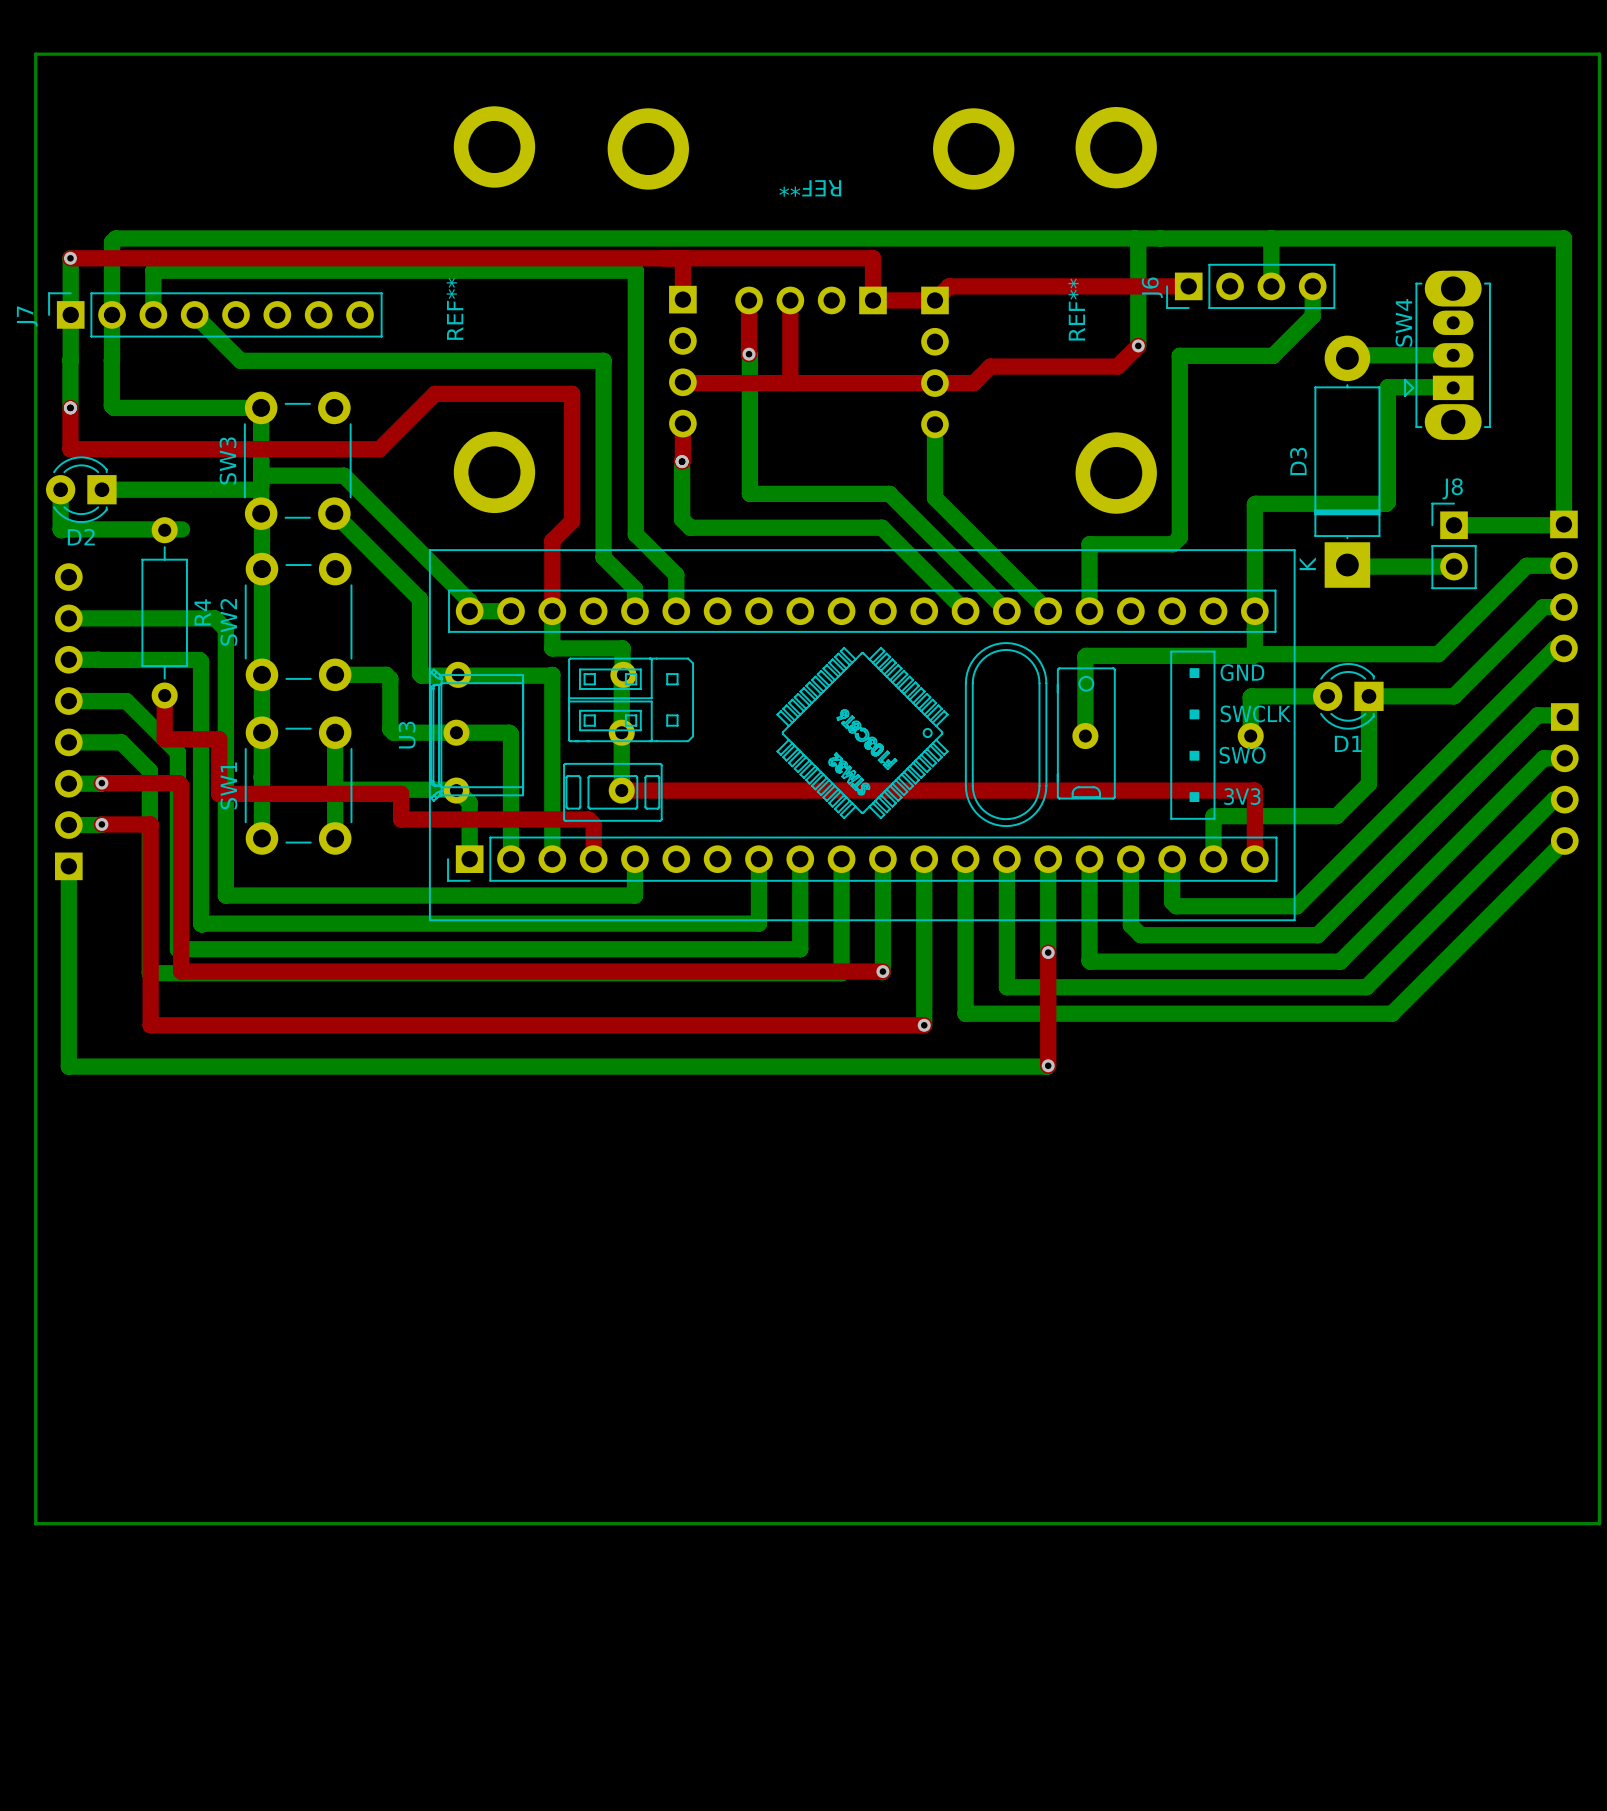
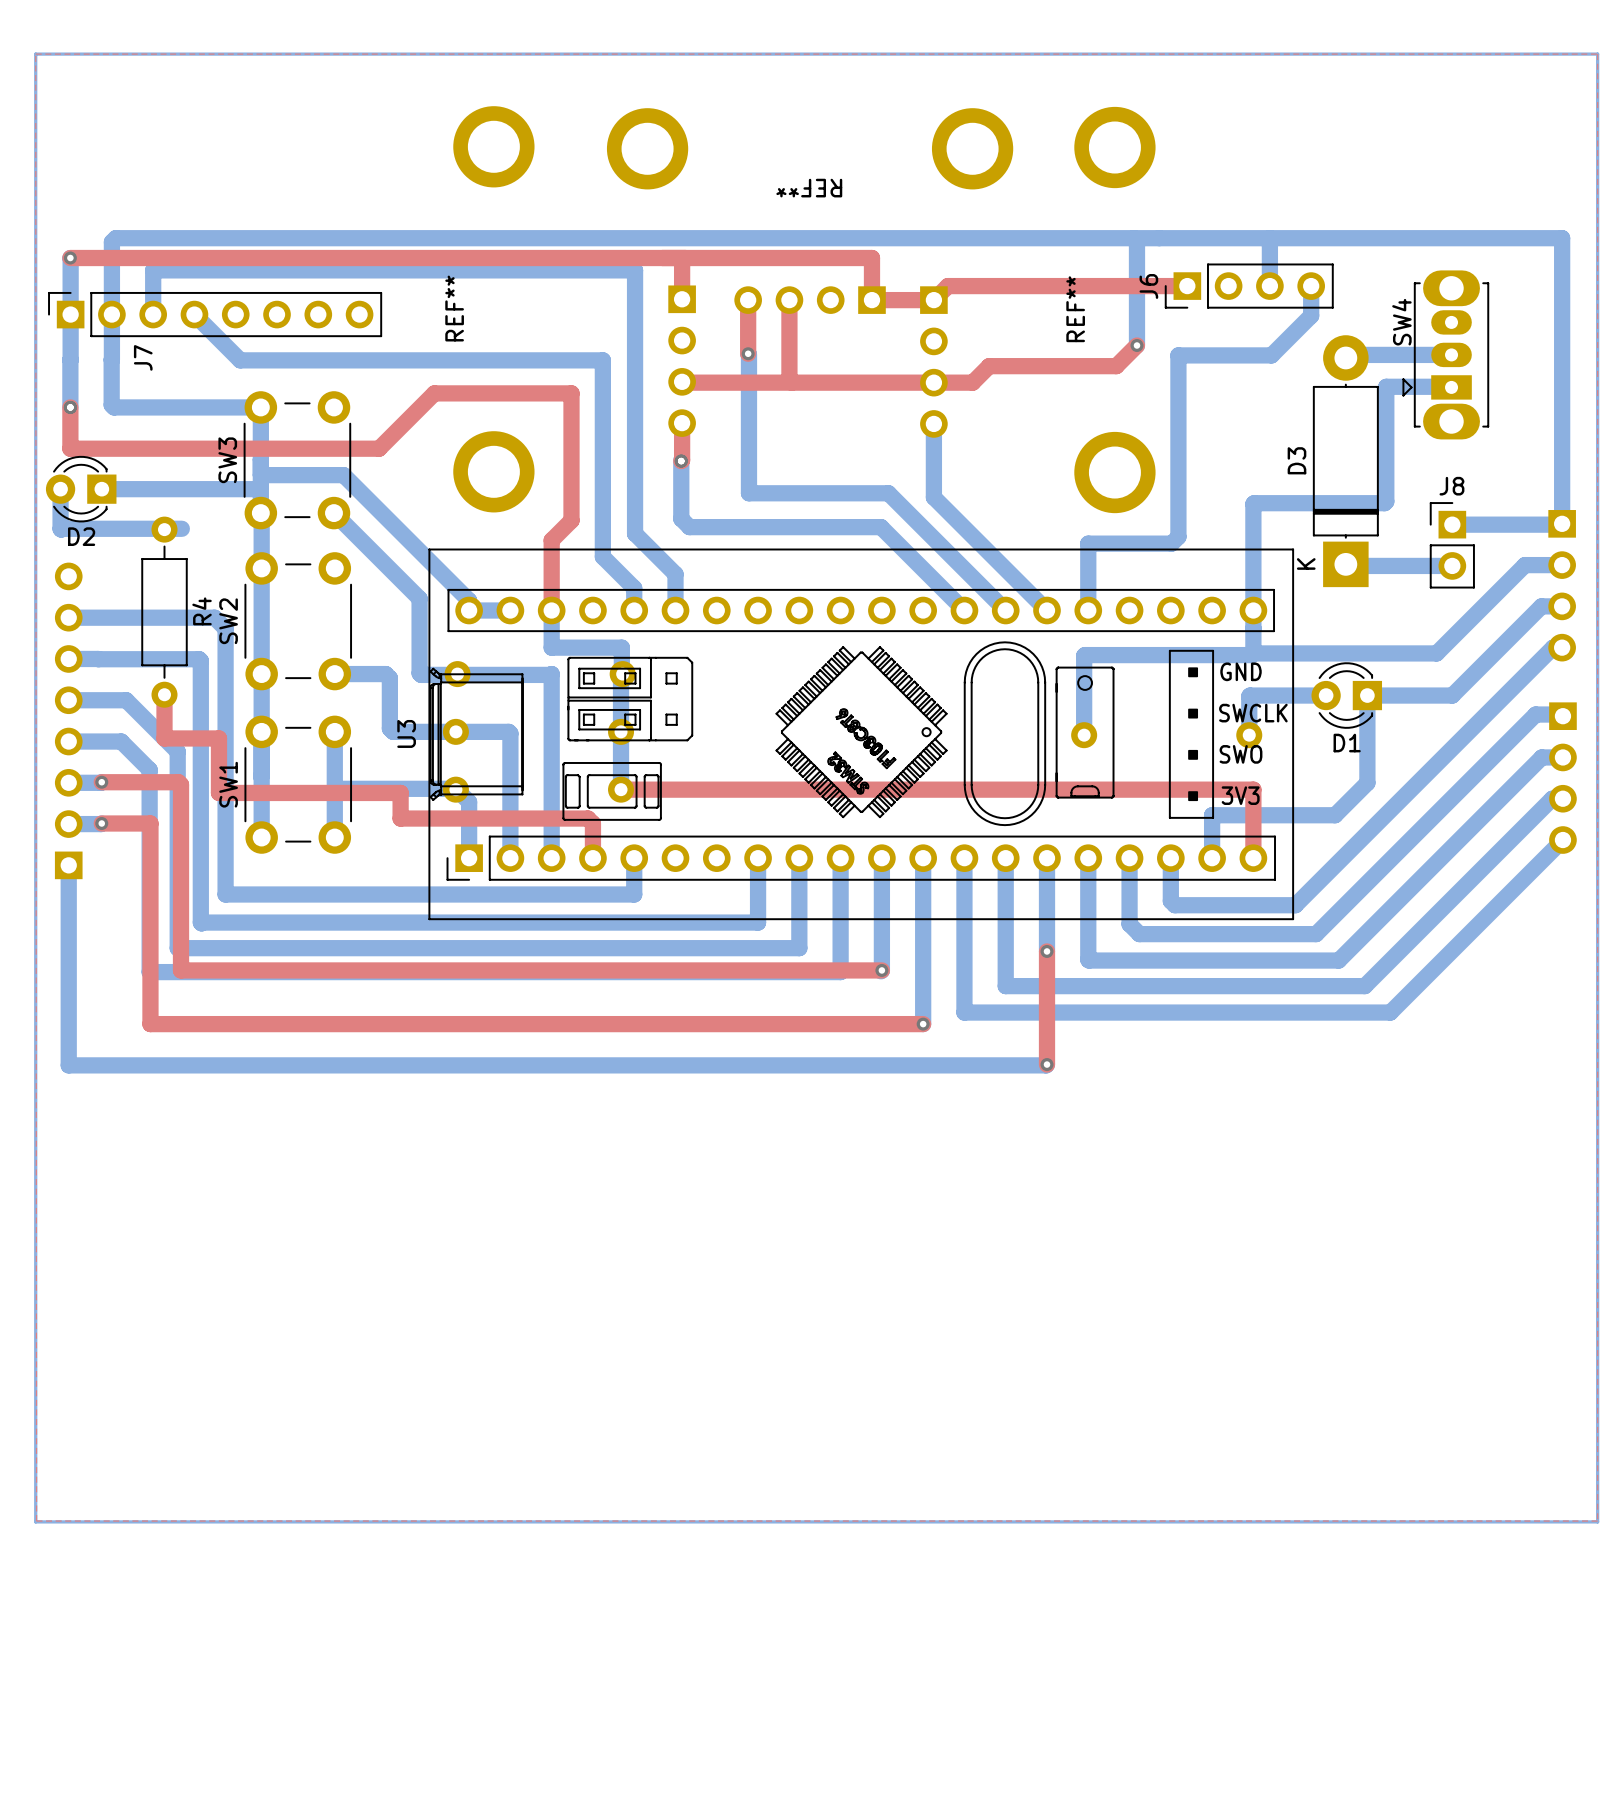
top zone outline: none -> (35, 54) (36, 1521) (1597, 1521) (1597, 54) (35, 54)
J7 name position: J7 (27, 316) -> J7 (143, 357)

